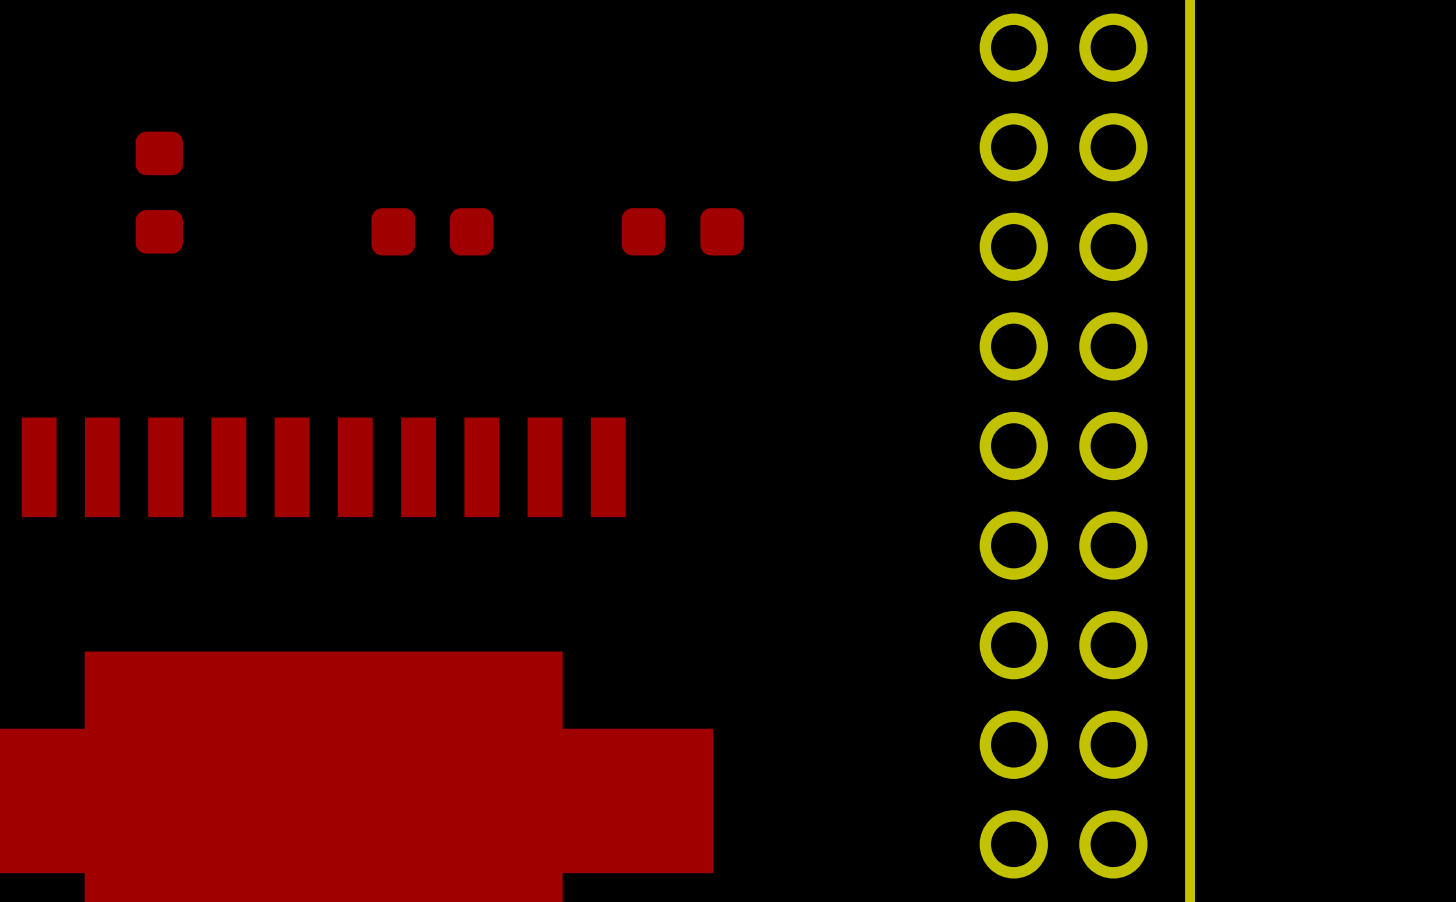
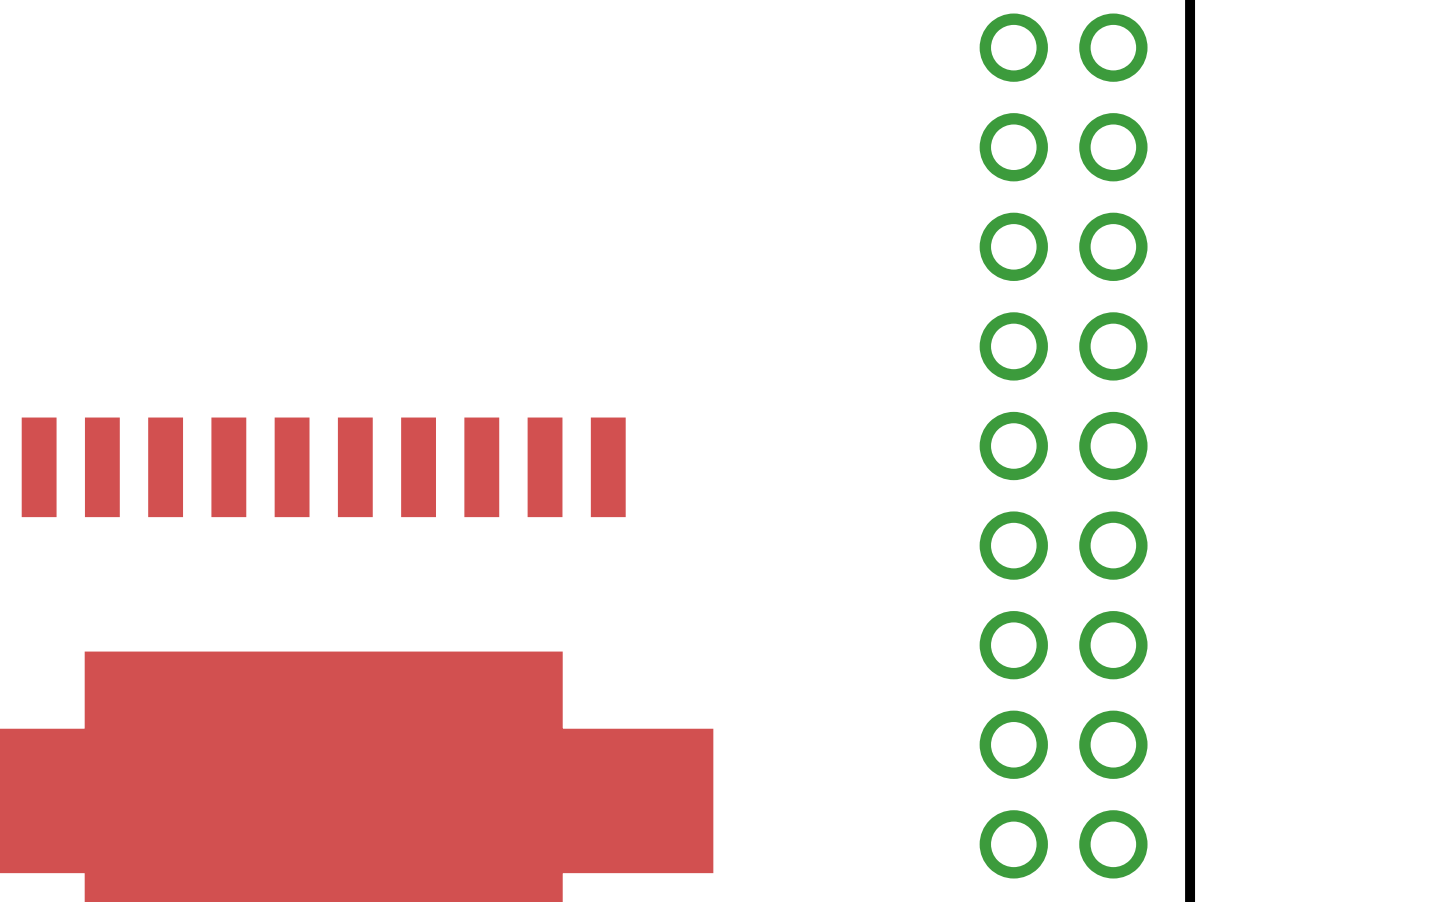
part: (159, 192) -> none
part: (432, 231) -> none
part: (682, 231) -> none

